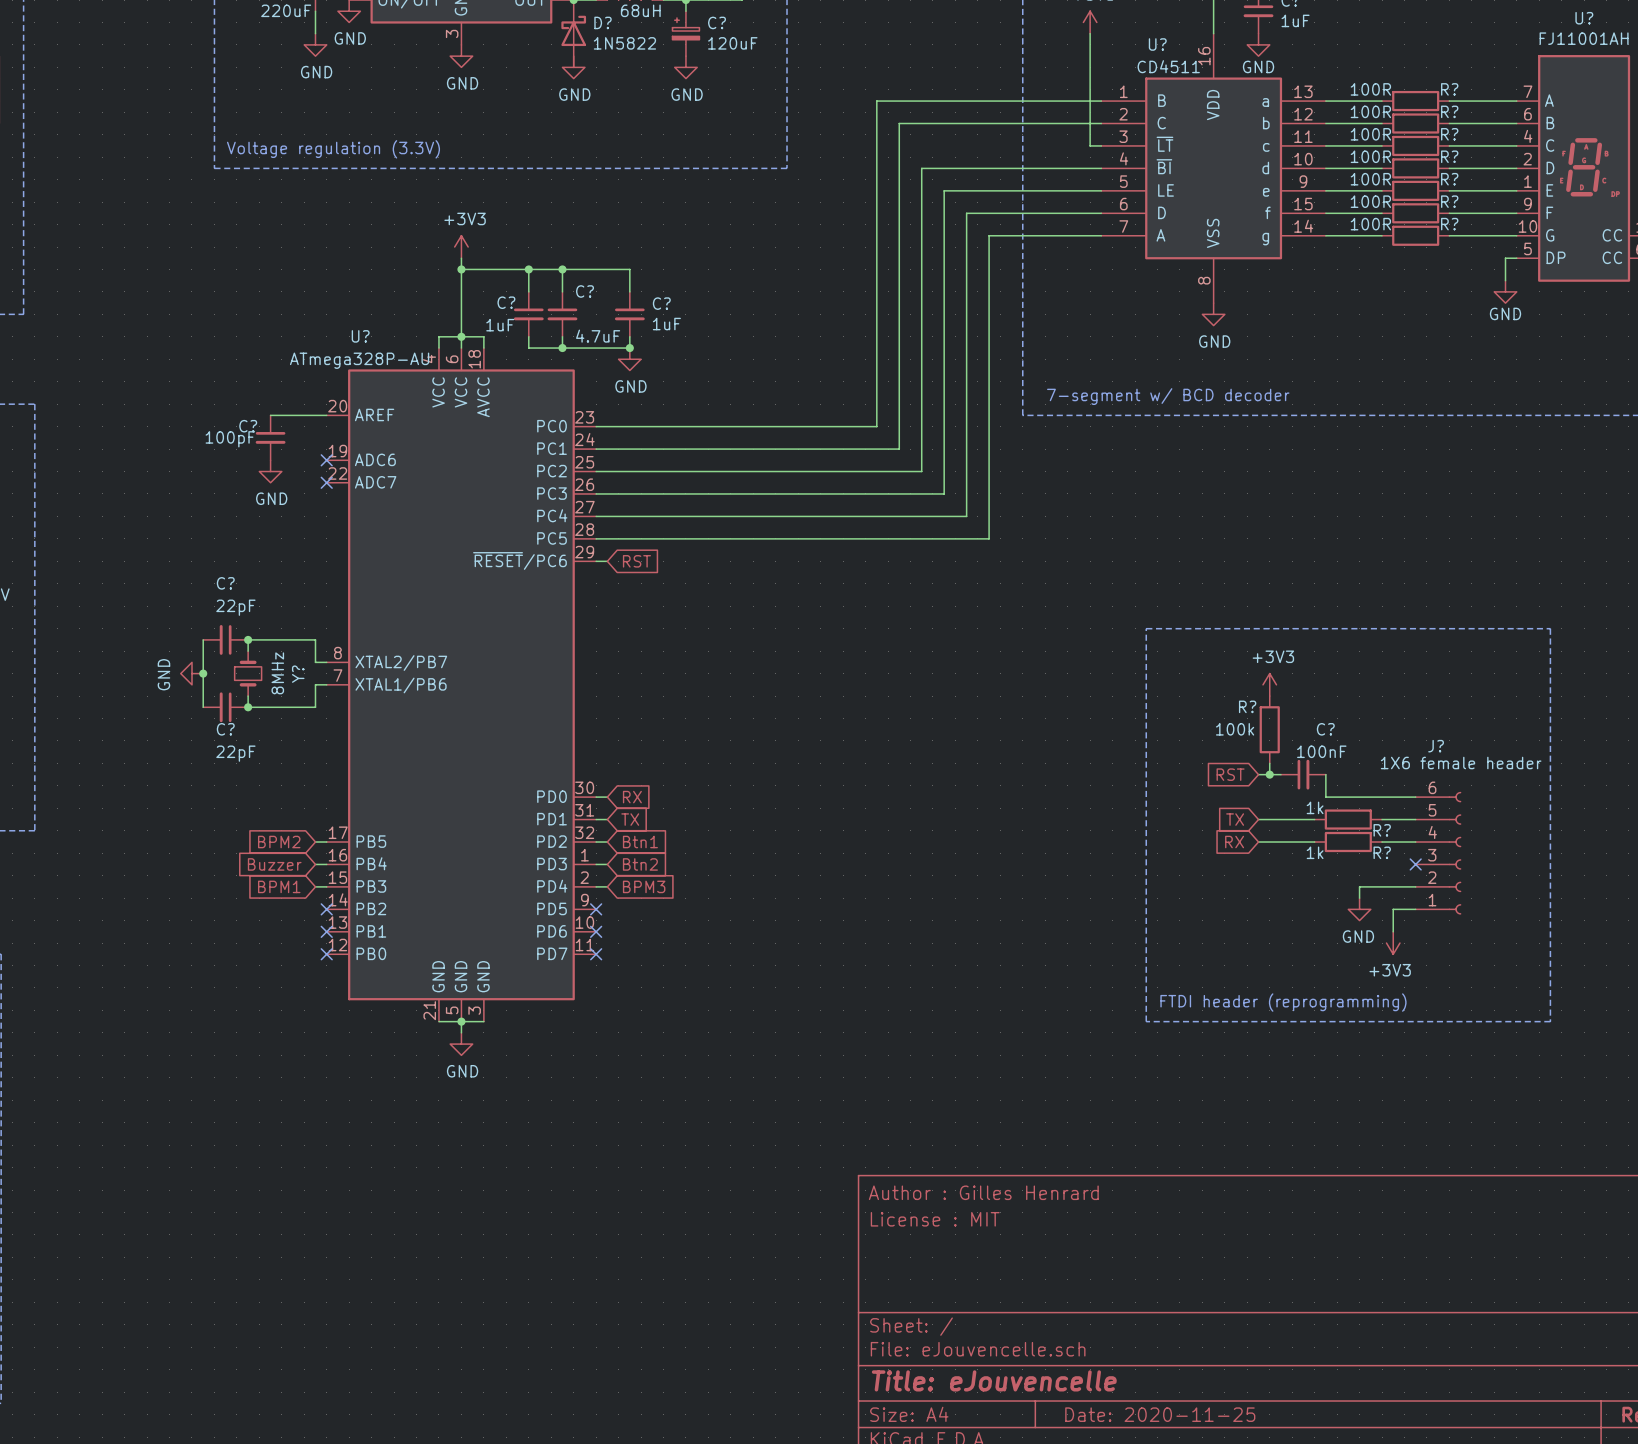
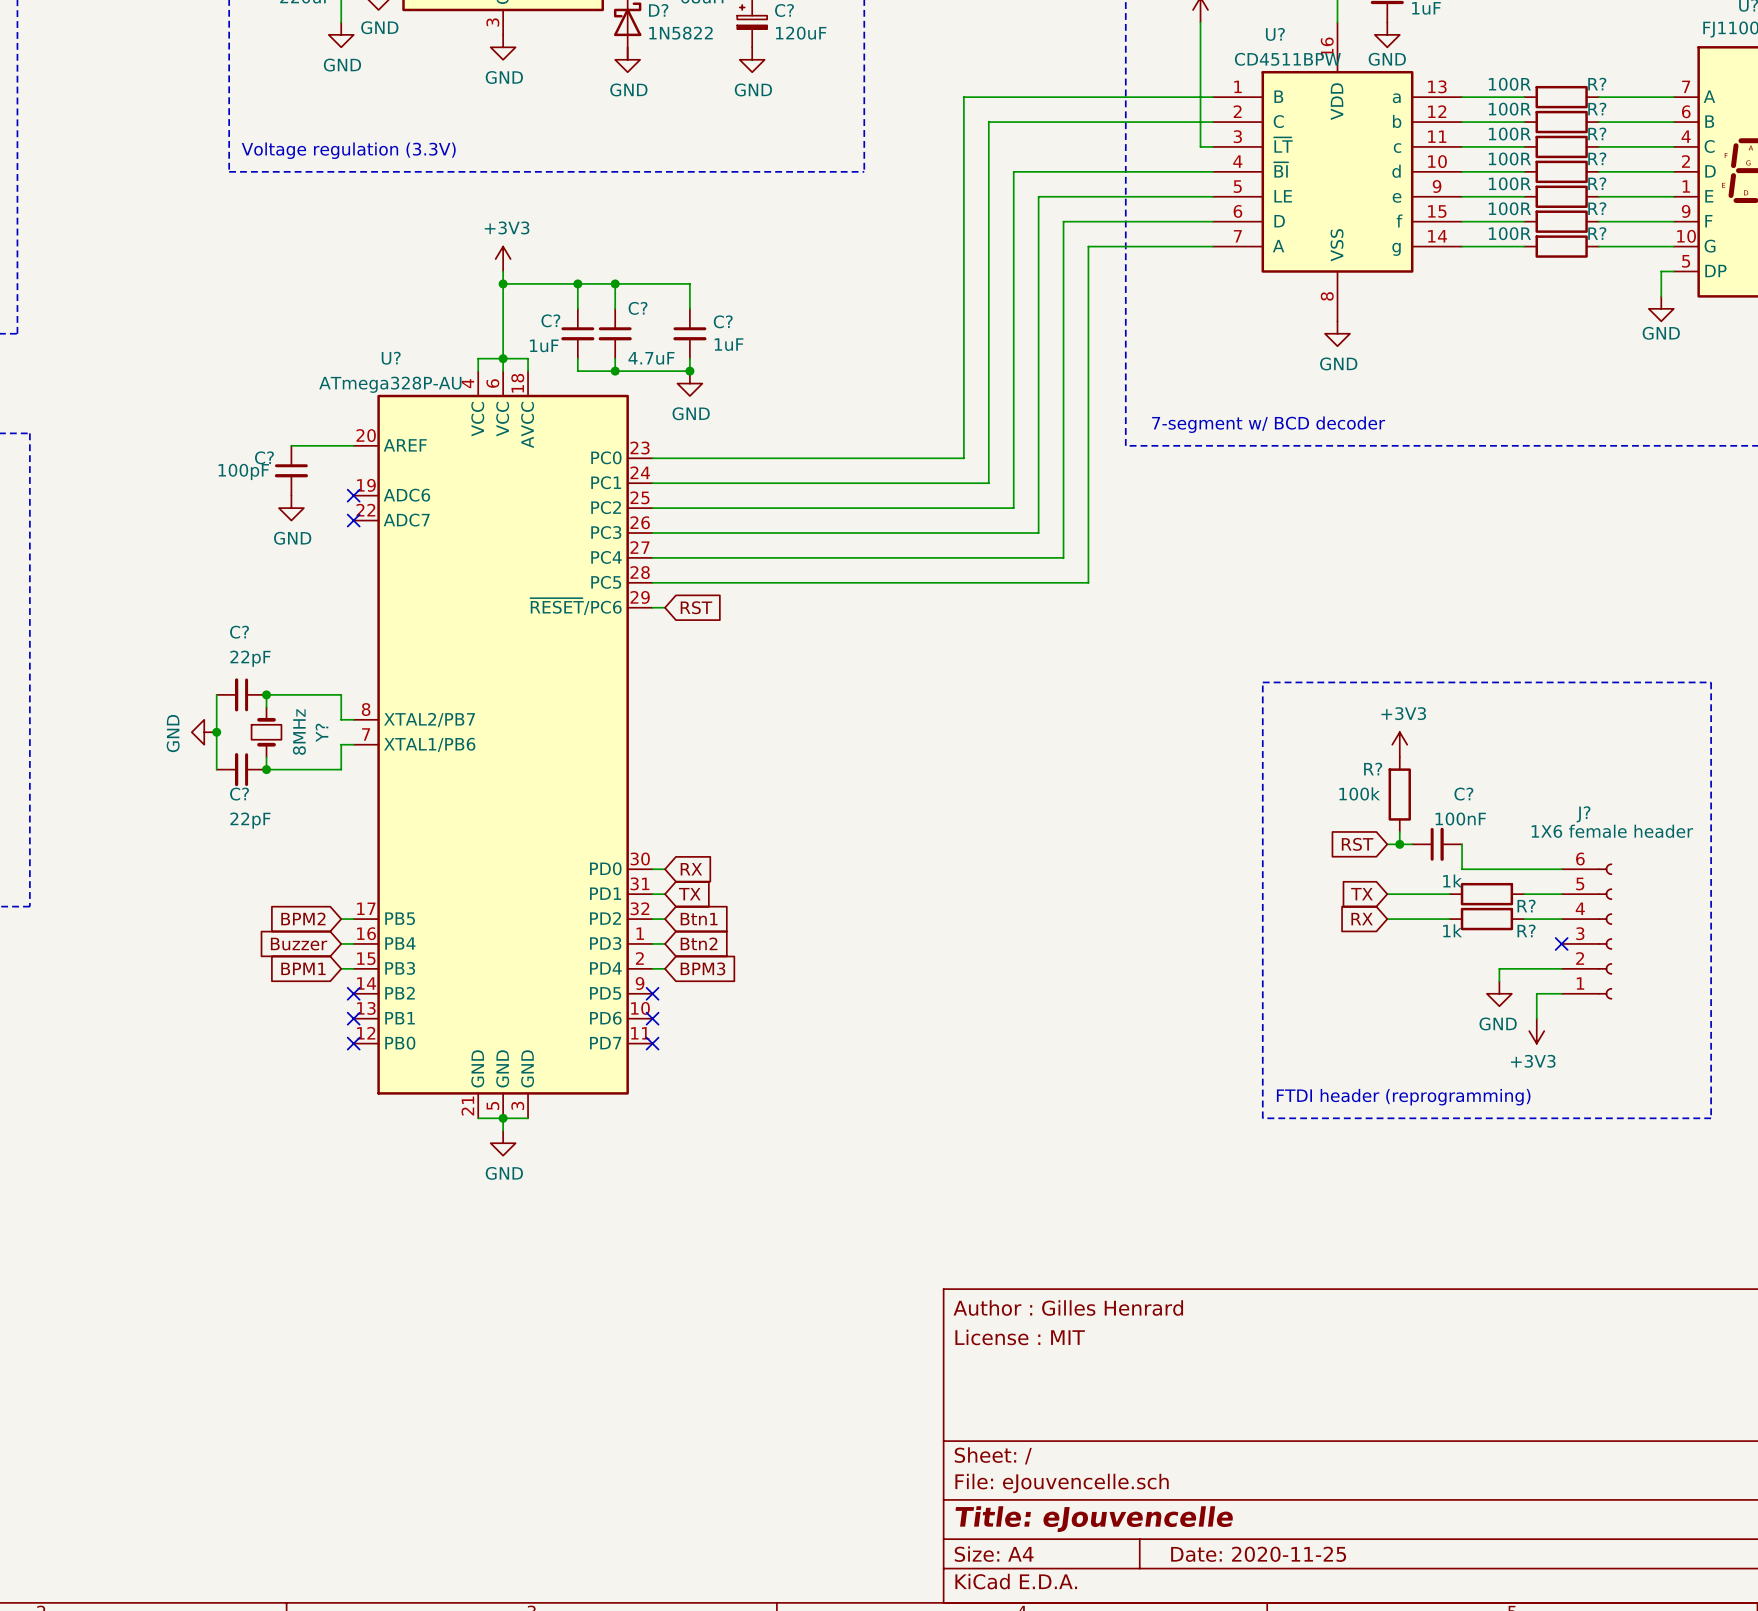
U? value: CD4511 (1168, 66) -> CD4511BPW (1287, 59)

